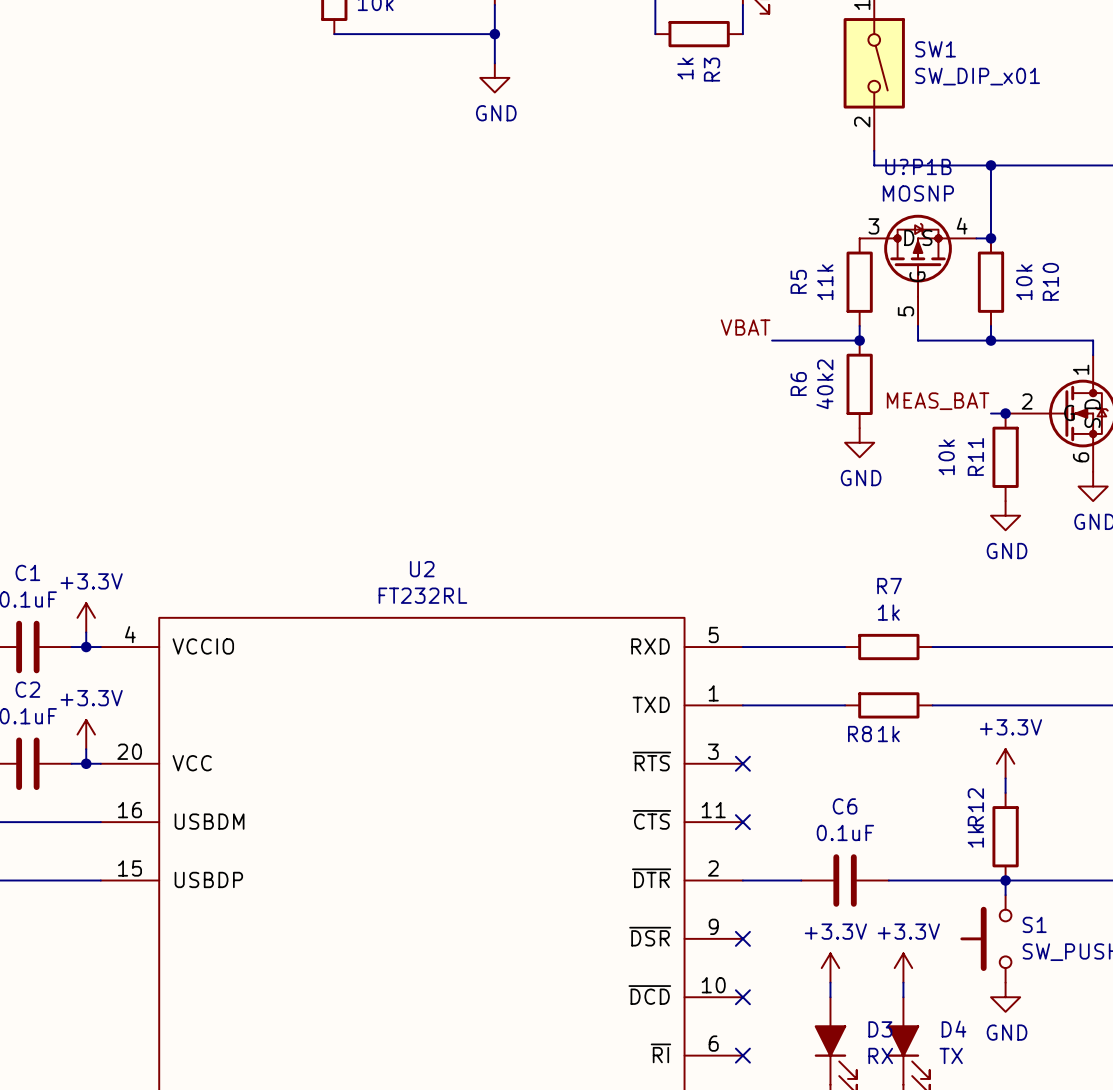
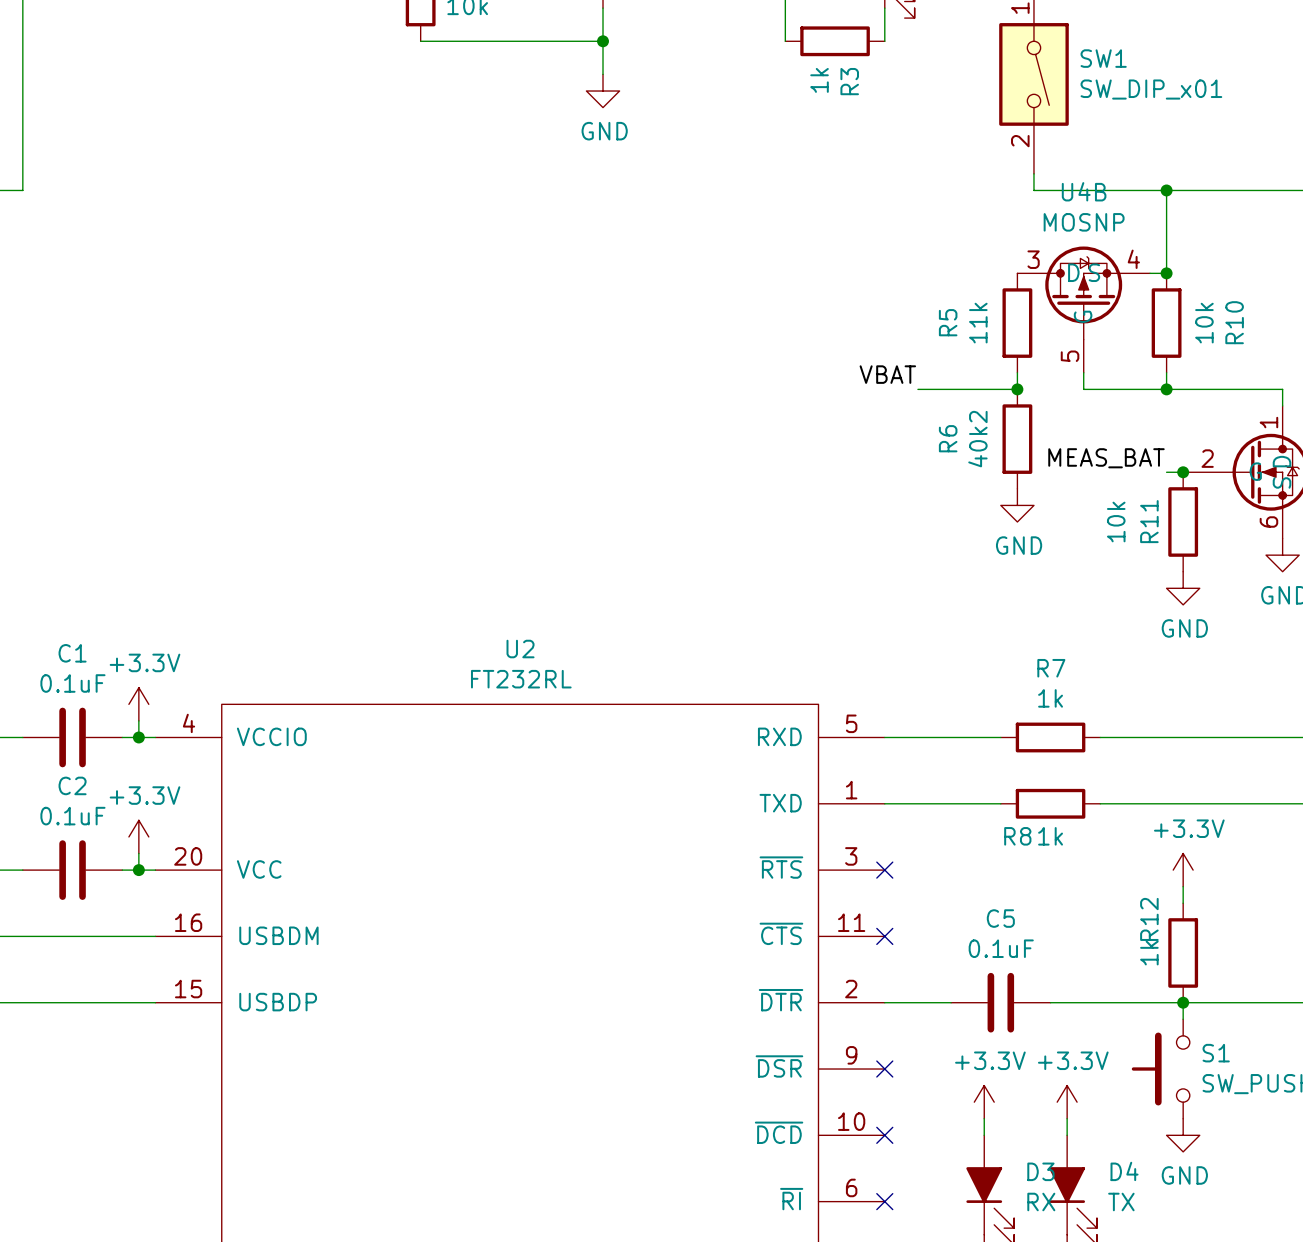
U?P1B name: U?P1B (918, 166) -> U4B (1084, 191)
C6 name: C6 (845, 806) -> C5 (1000, 918)

